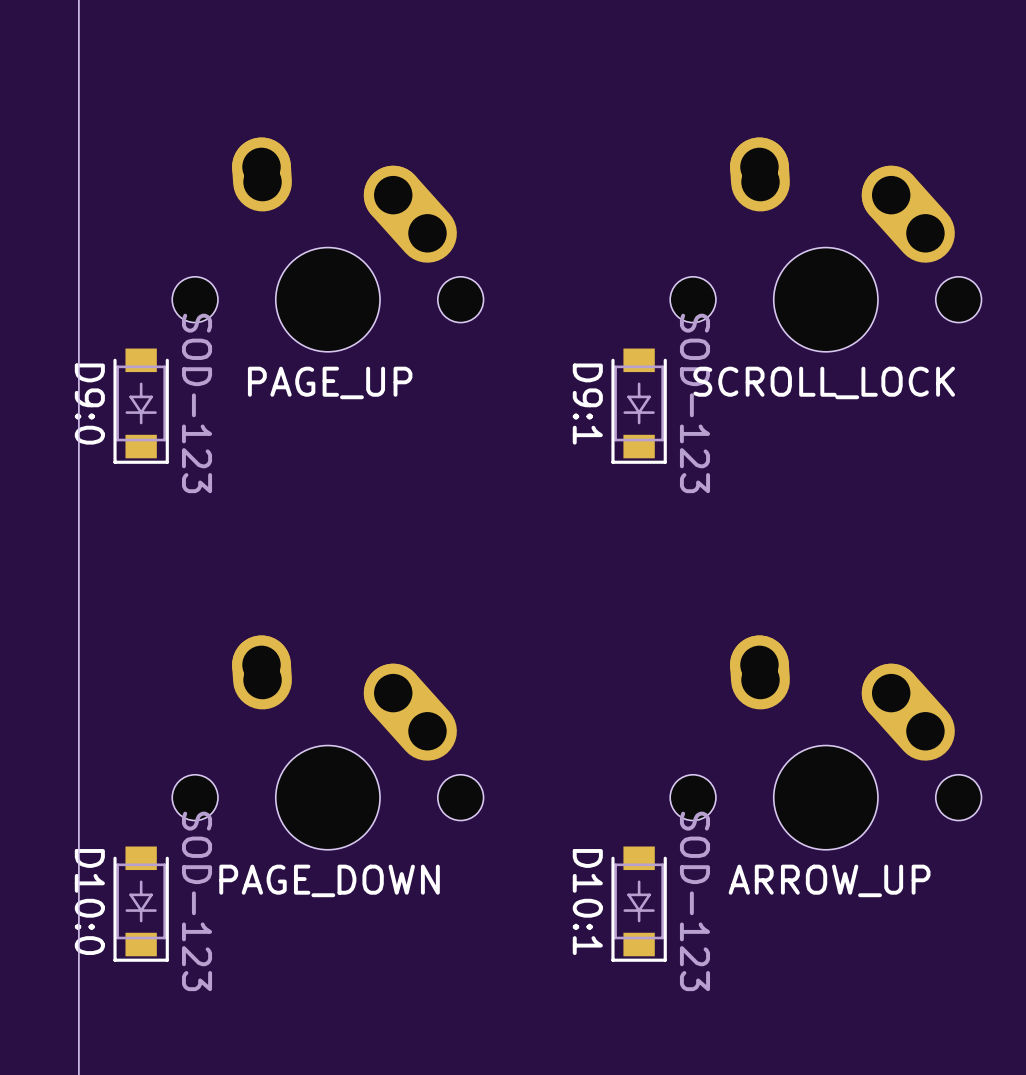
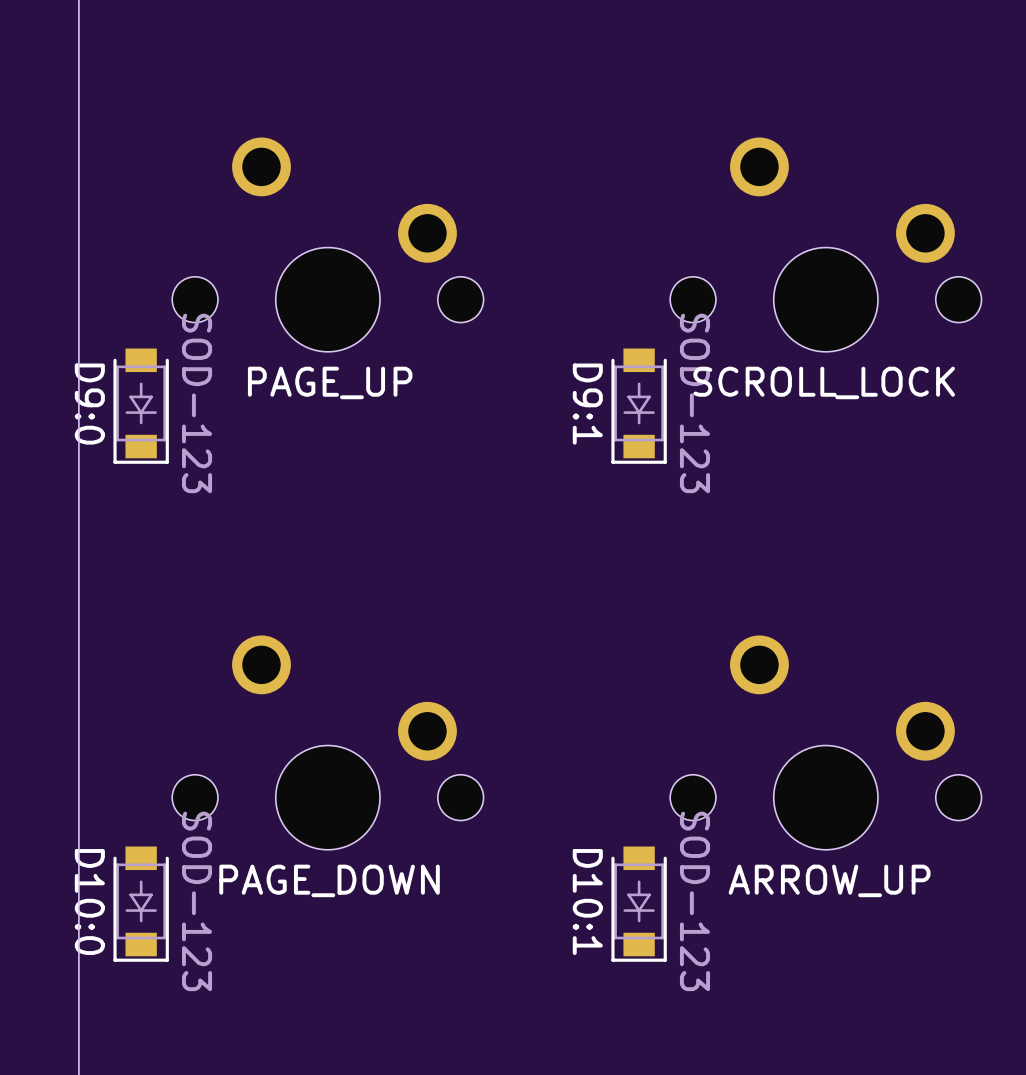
part footprint: [172, 137, 484, 352] -> [172, 137, 484, 352]
part footprint: [670, 137, 982, 352] -> [670, 137, 982, 352]
part footprint: [172, 635, 484, 850] -> [172, 635, 484, 850]
part footprint: [670, 635, 982, 850] -> [670, 635, 982, 850]

